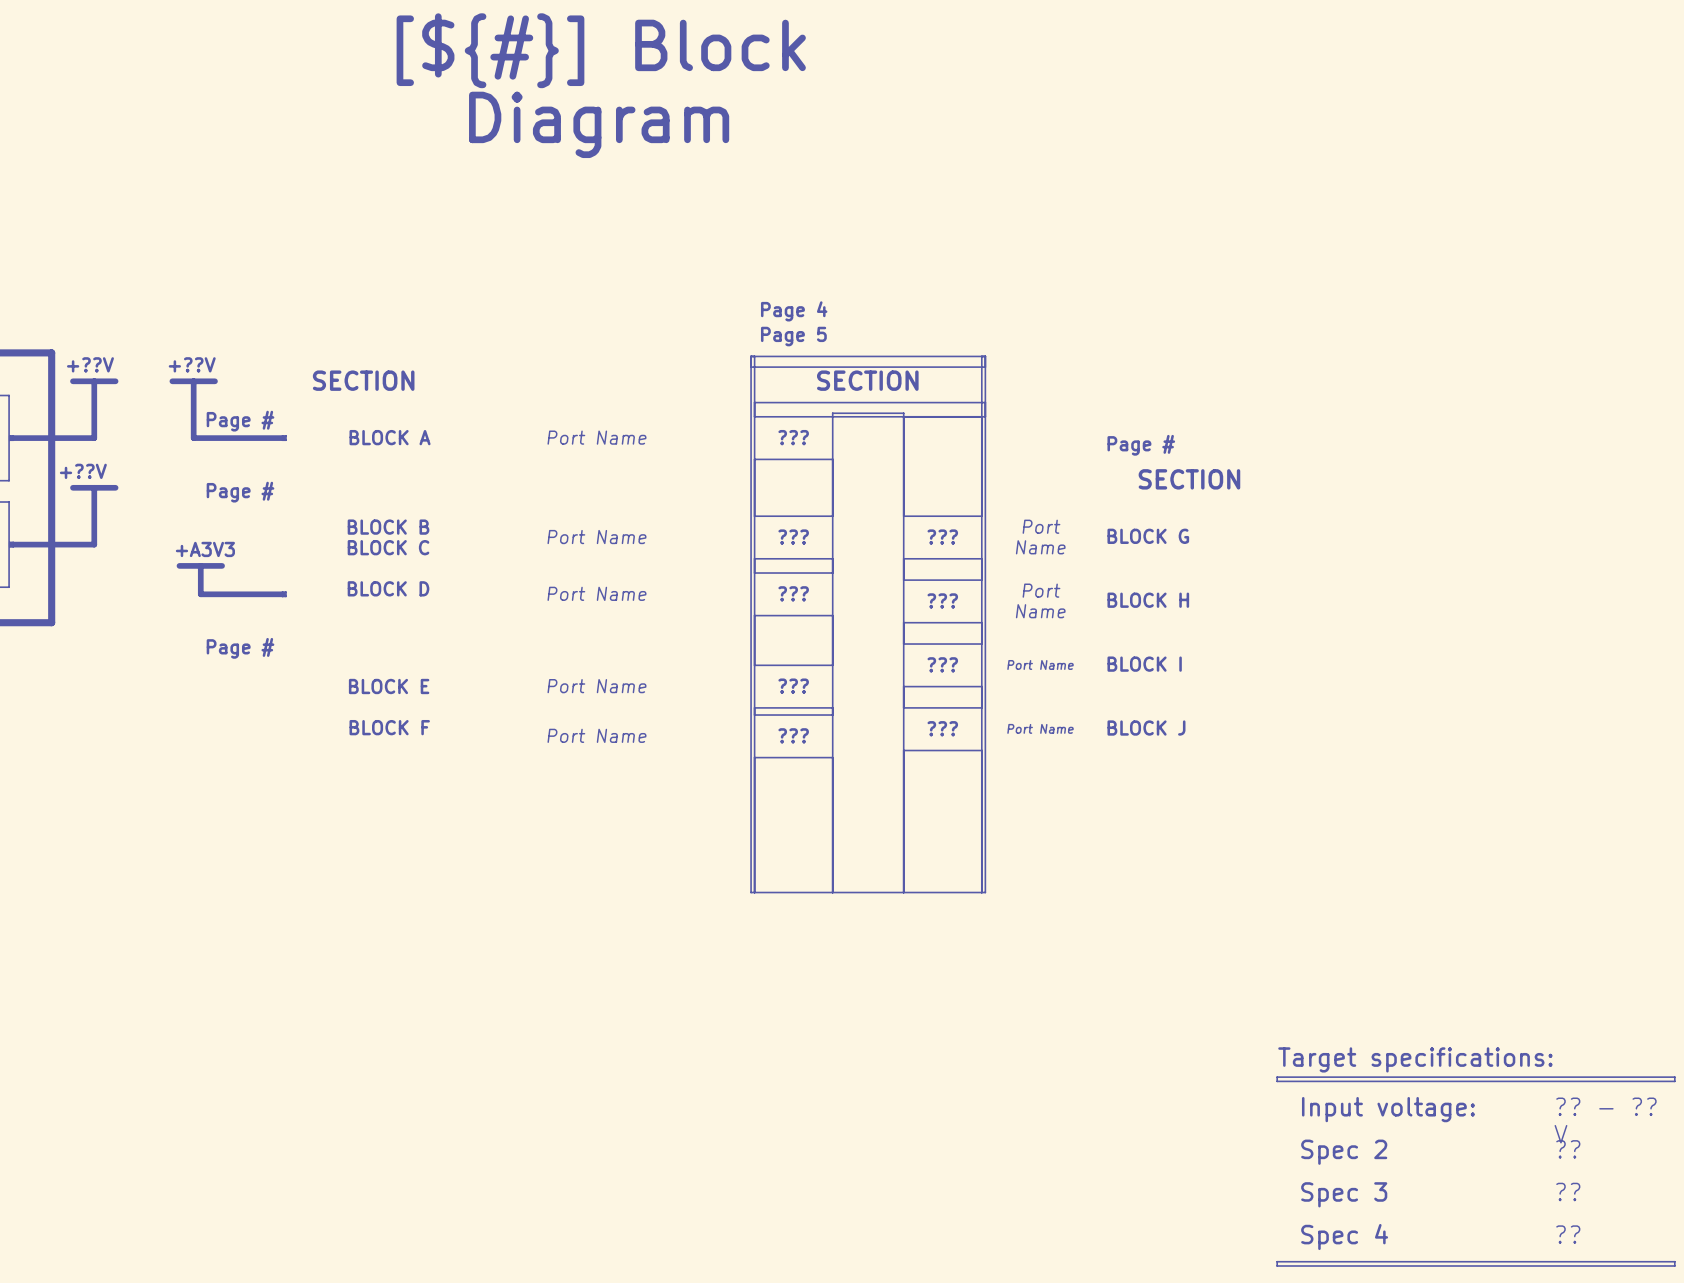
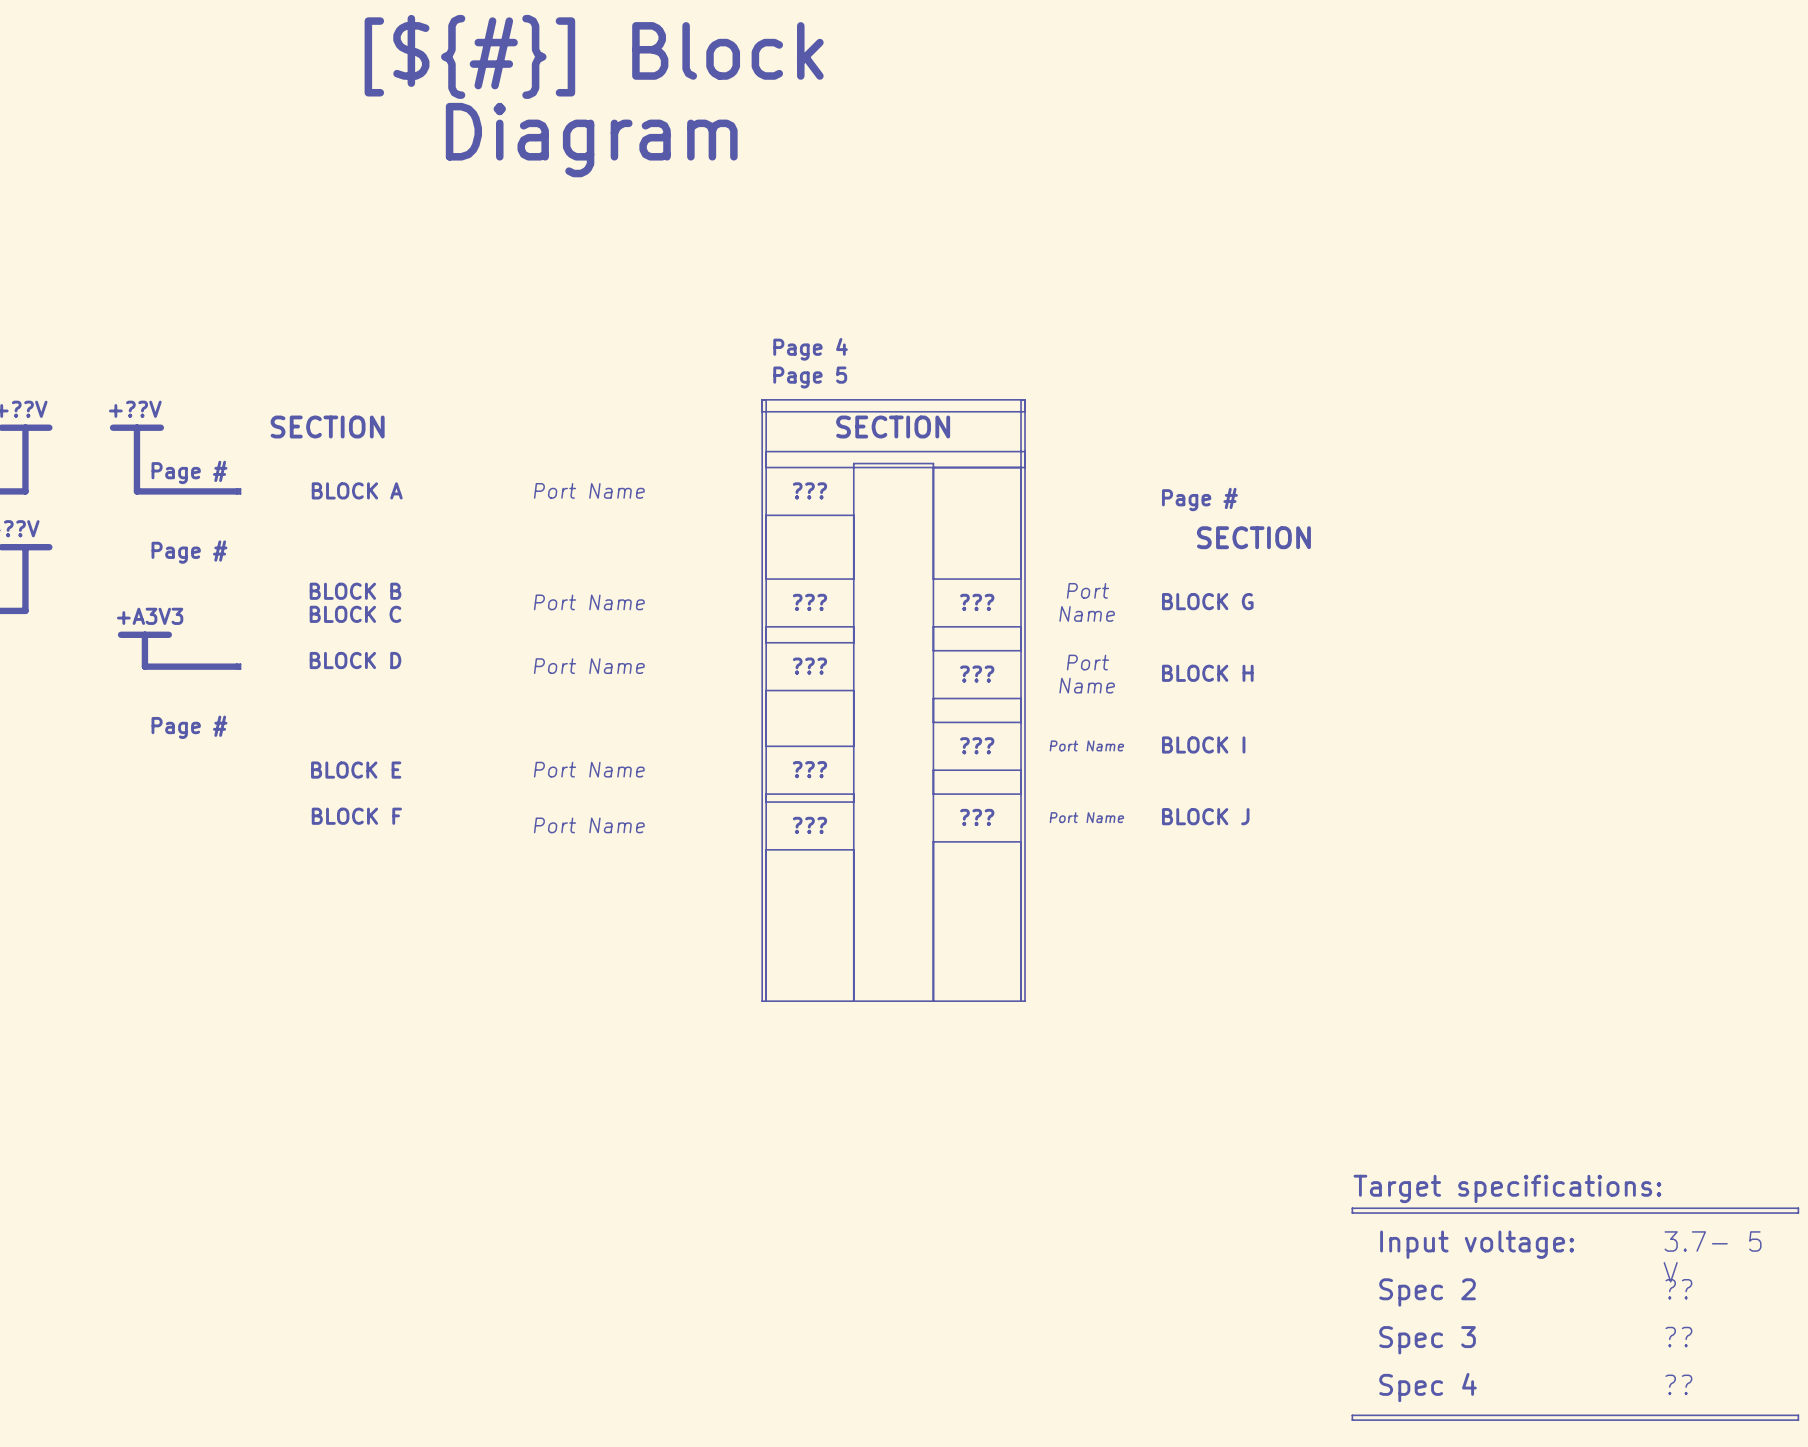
text: ?? - ?? (1606, 1106) -> 3.7- 5 (1713, 1241)

